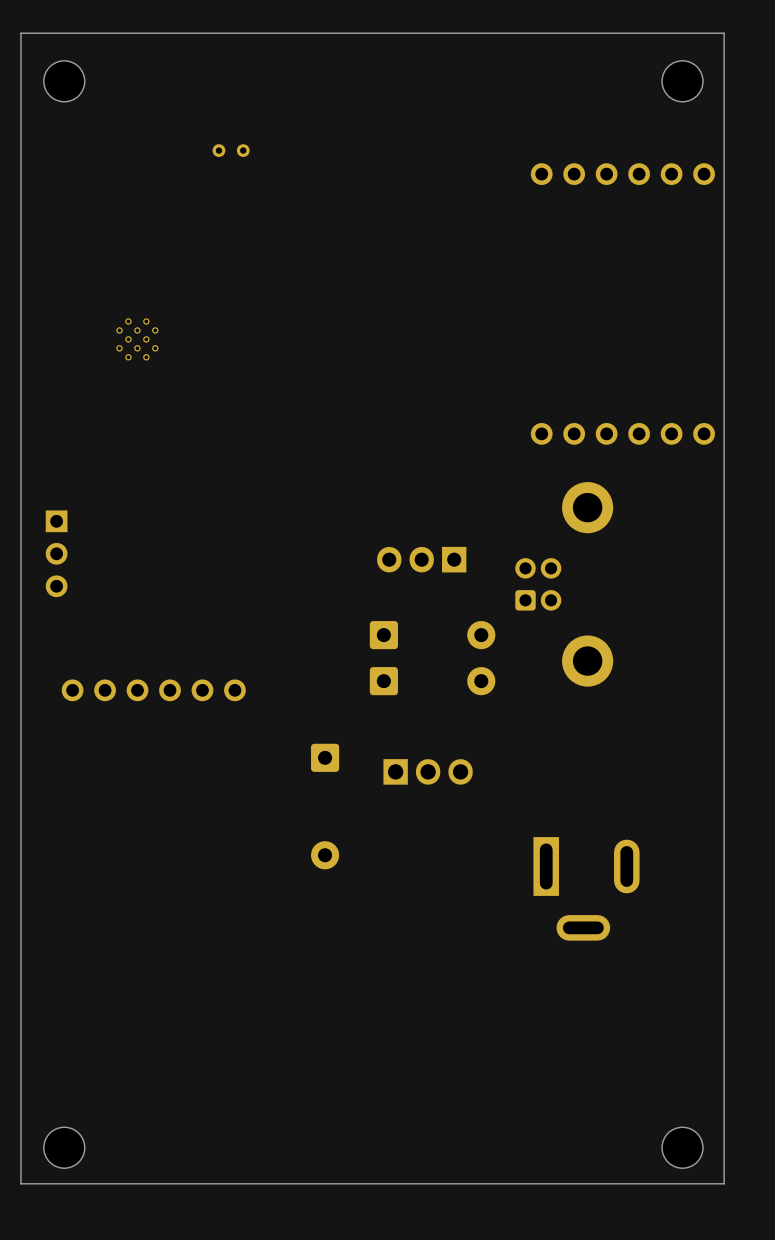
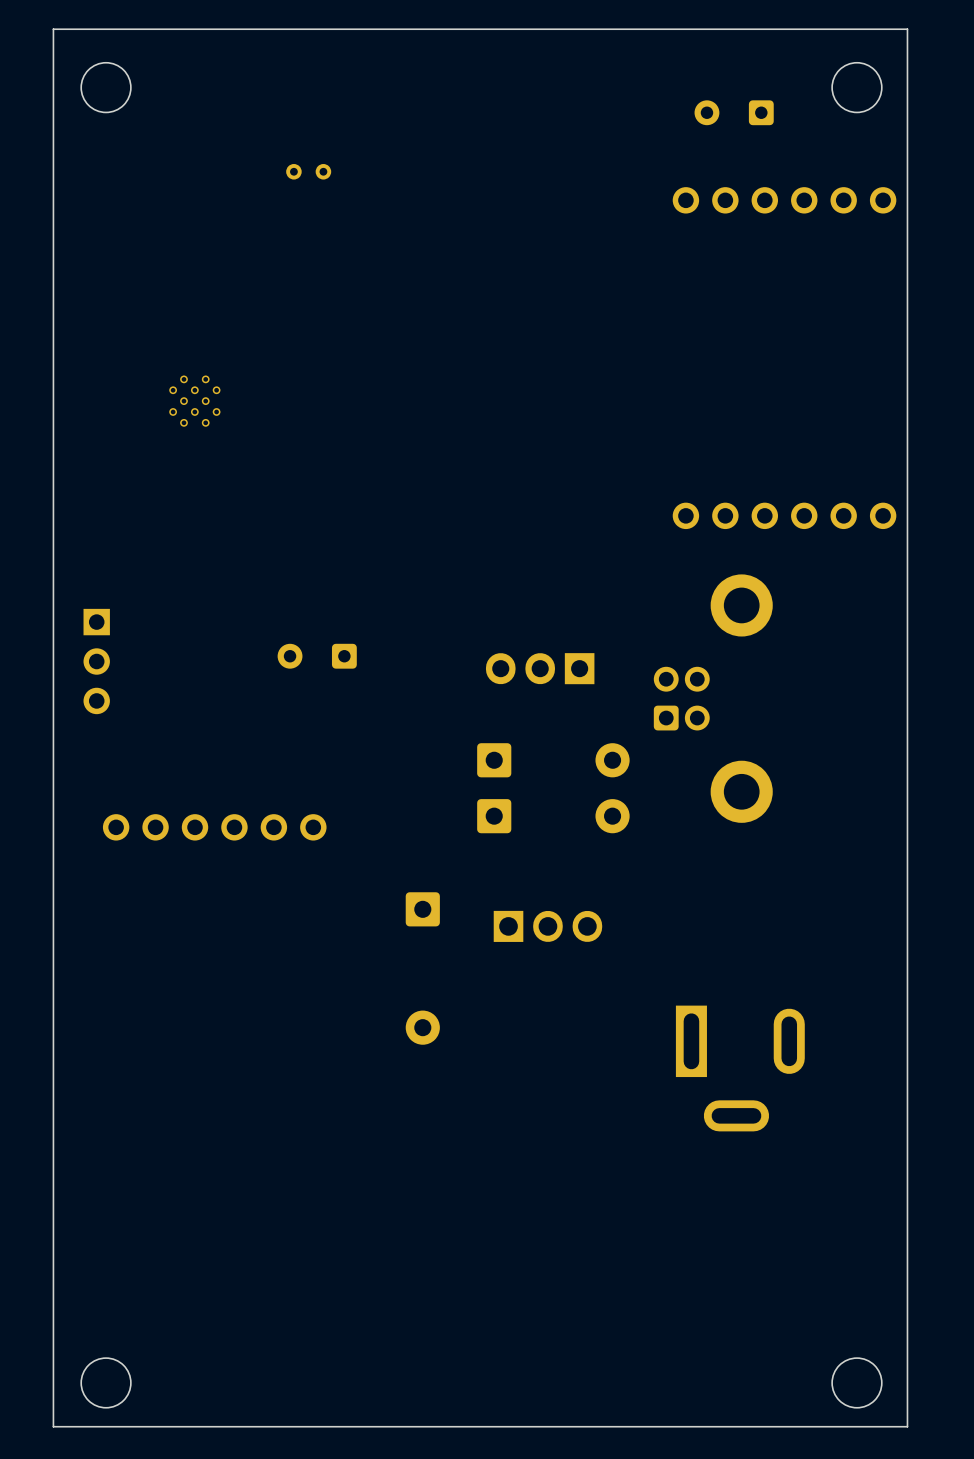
part: none -> (734, 112)
part: none -> (317, 656)

